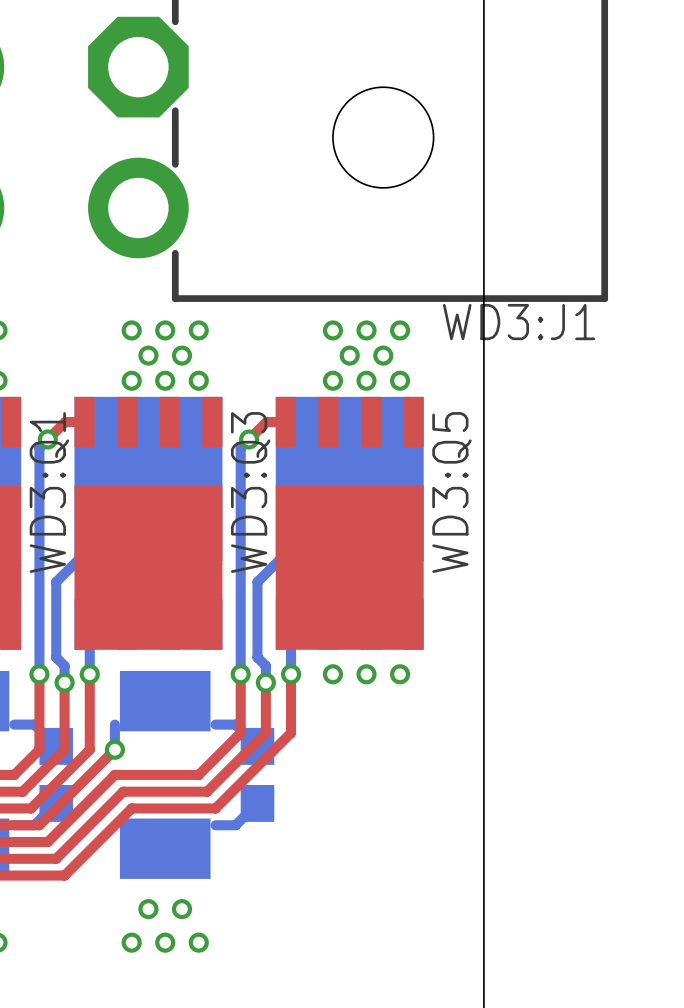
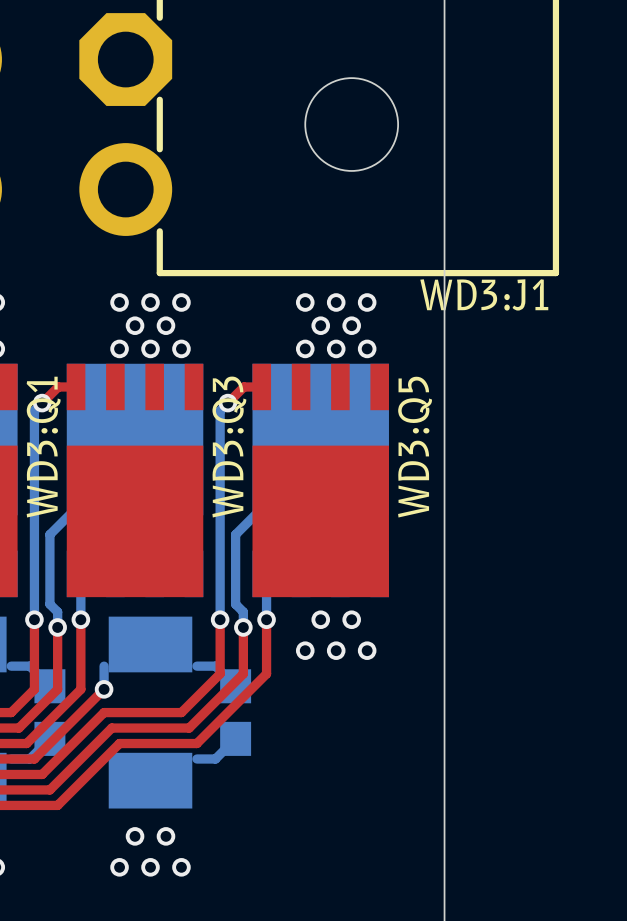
via: (332, 674) -> none
via: none -> (320, 619)
via: (366, 674) -> none
via: none -> (351, 619)
via: (400, 674) -> none
via: none -> (305, 650)
via: none -> (336, 650)
via: none -> (367, 650)

